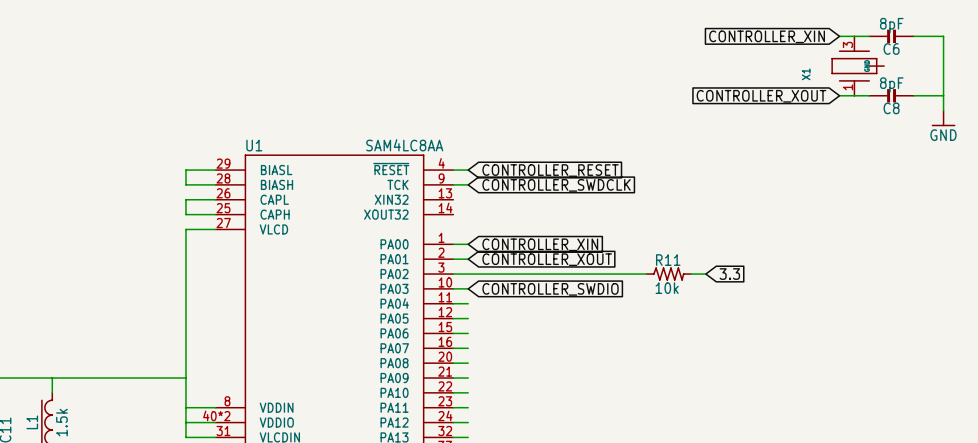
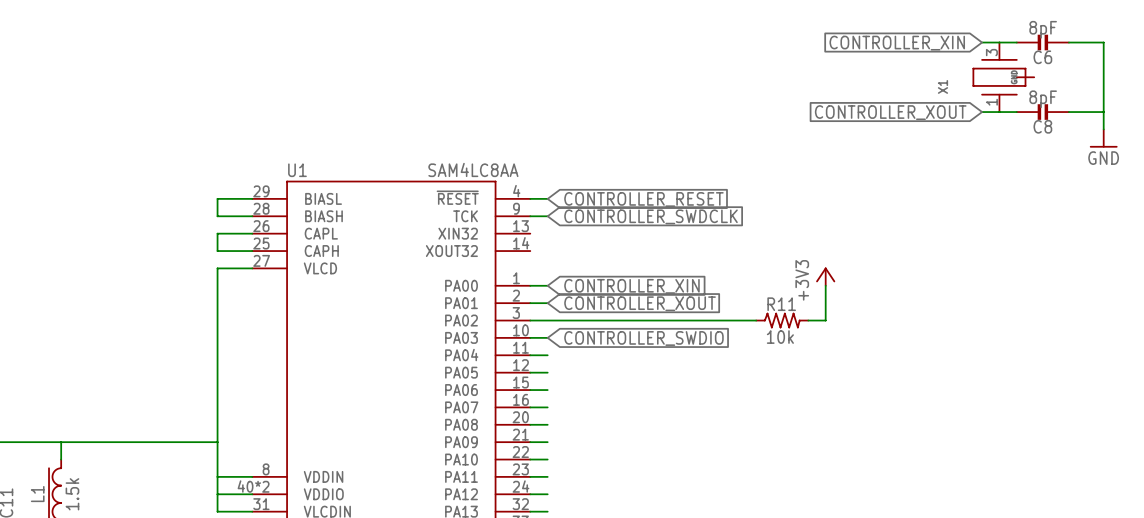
power symbol: none -> +3V3 (825, 276)
wire: none -> (825, 285) (825, 320)
global label: 3.3 (729, 274) -> none

